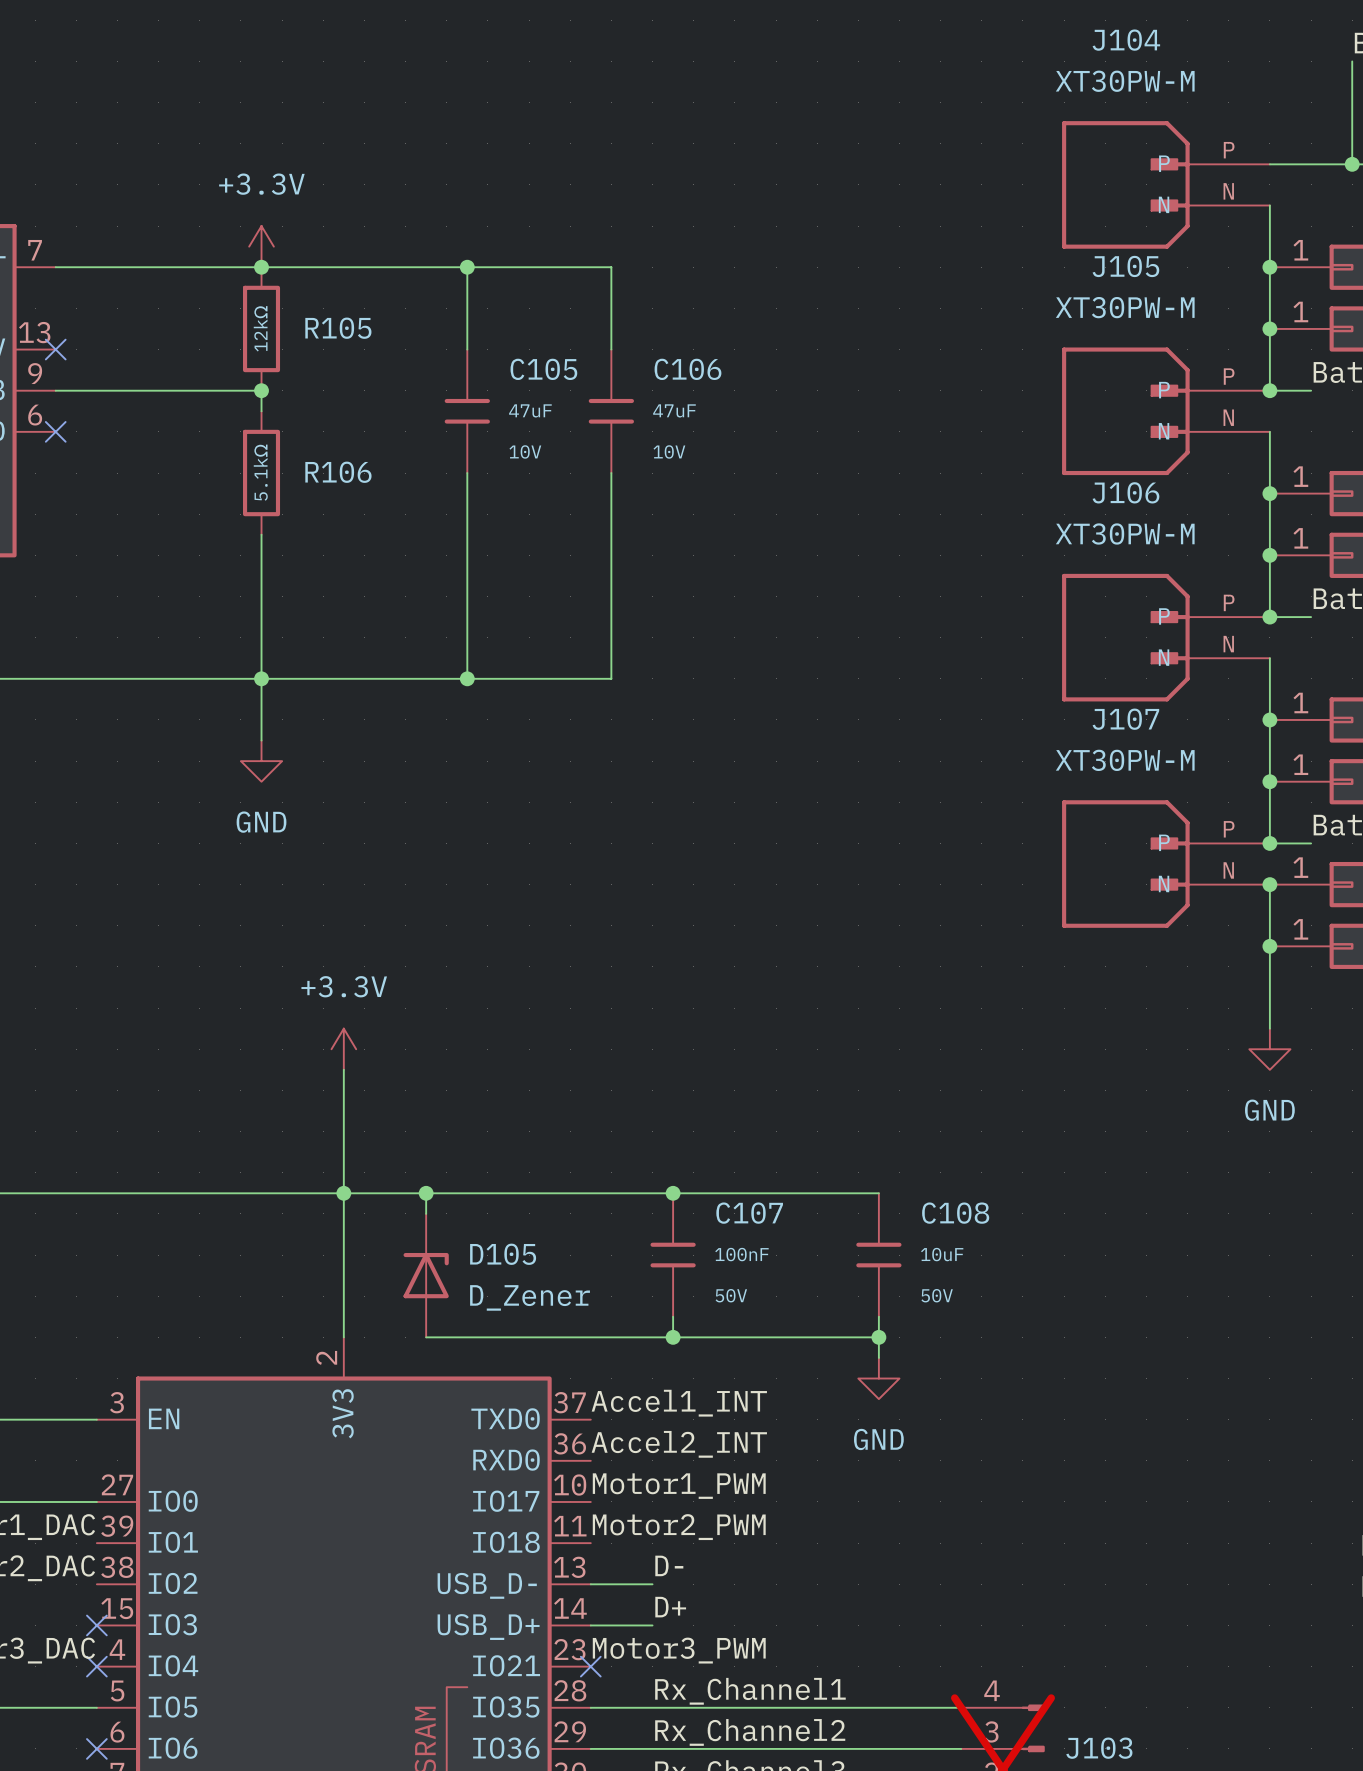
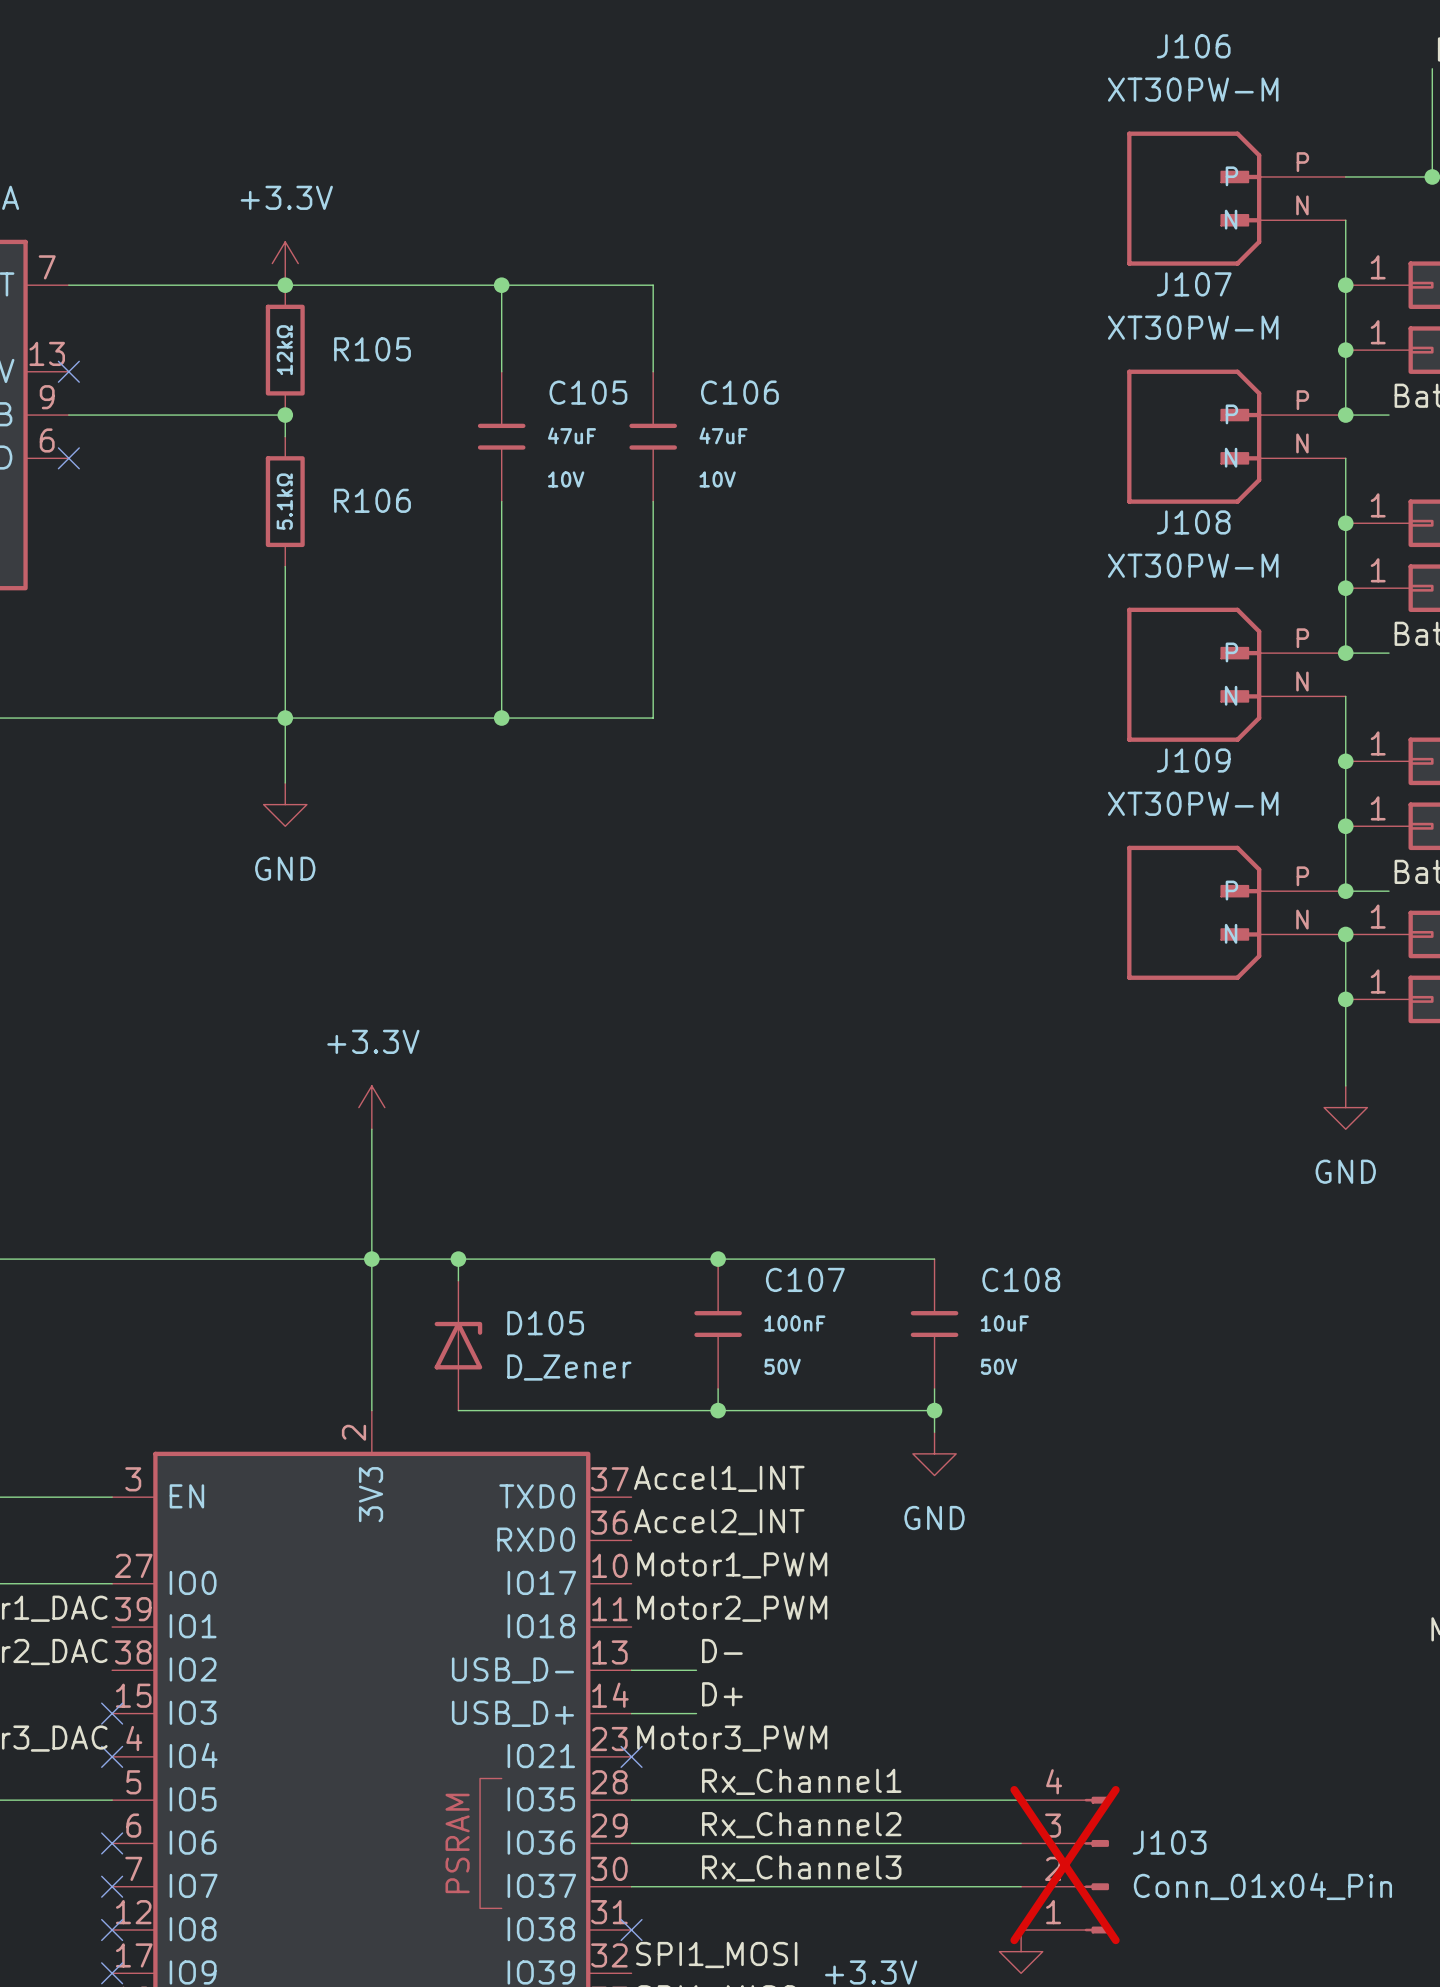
J104 name: J104 (1126, 40) -> J106 (1193, 46)
J105 name: J105 (1125, 266) -> J107 (1194, 284)
J106 name: J106 (1125, 492) -> J108 (1193, 522)
J107 name: J107 (1125, 719) -> J109 (1193, 760)

